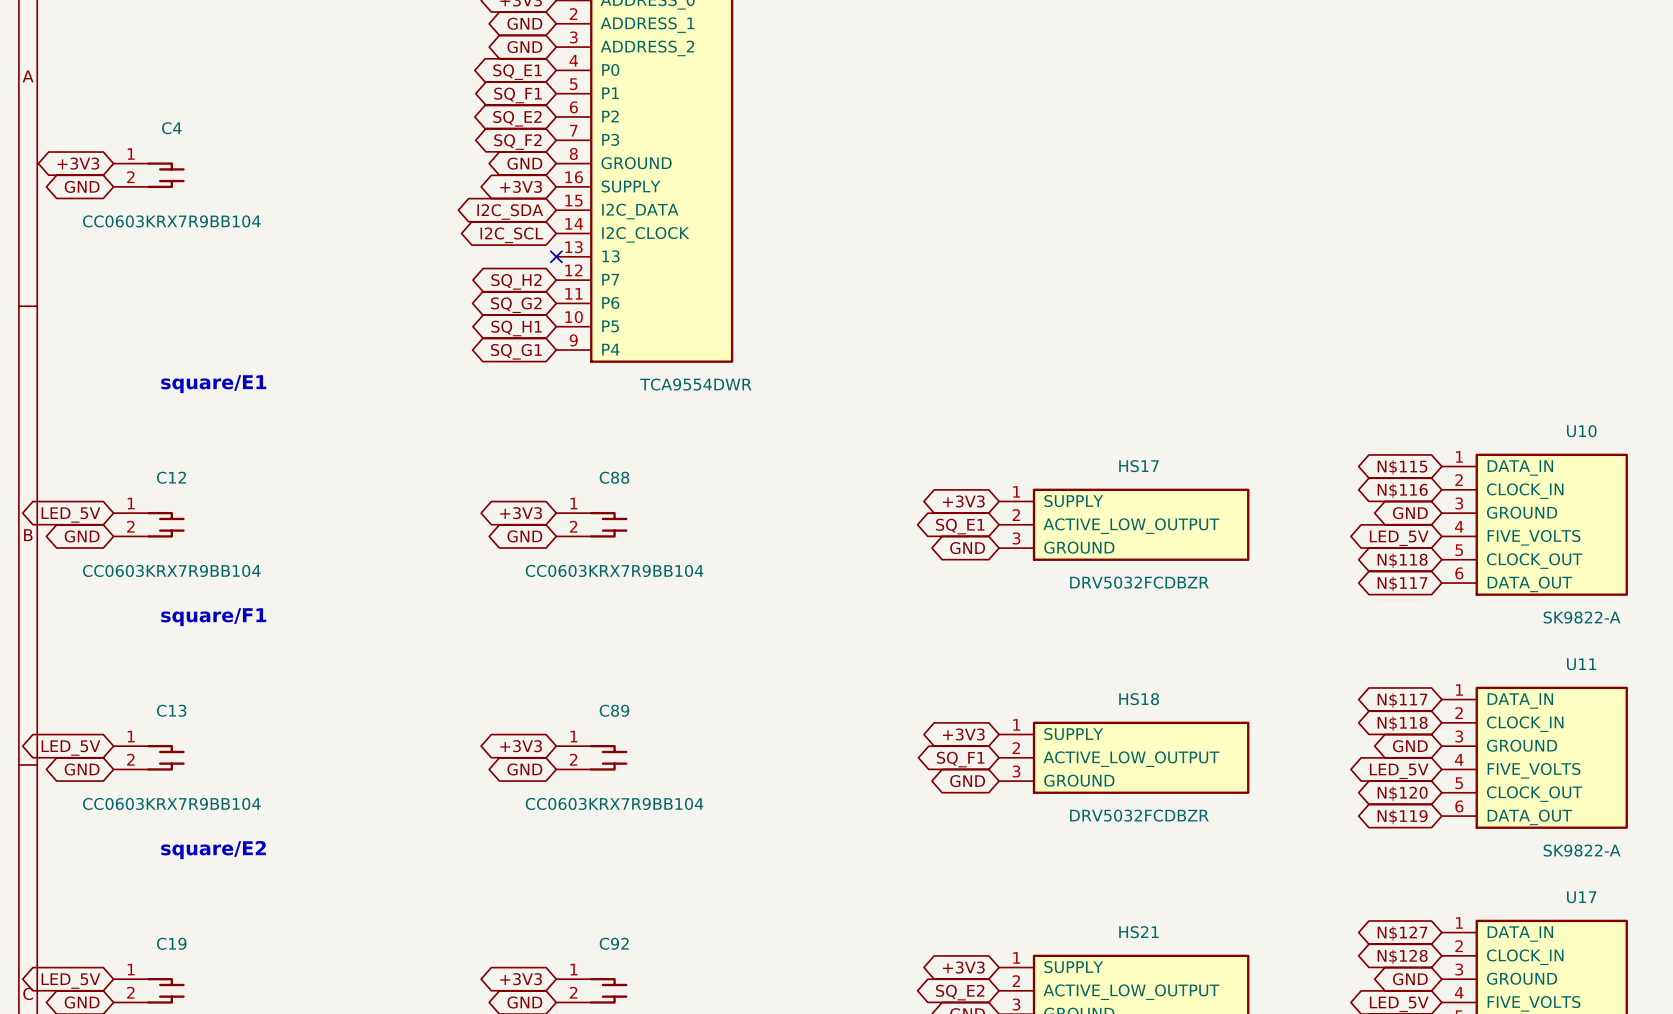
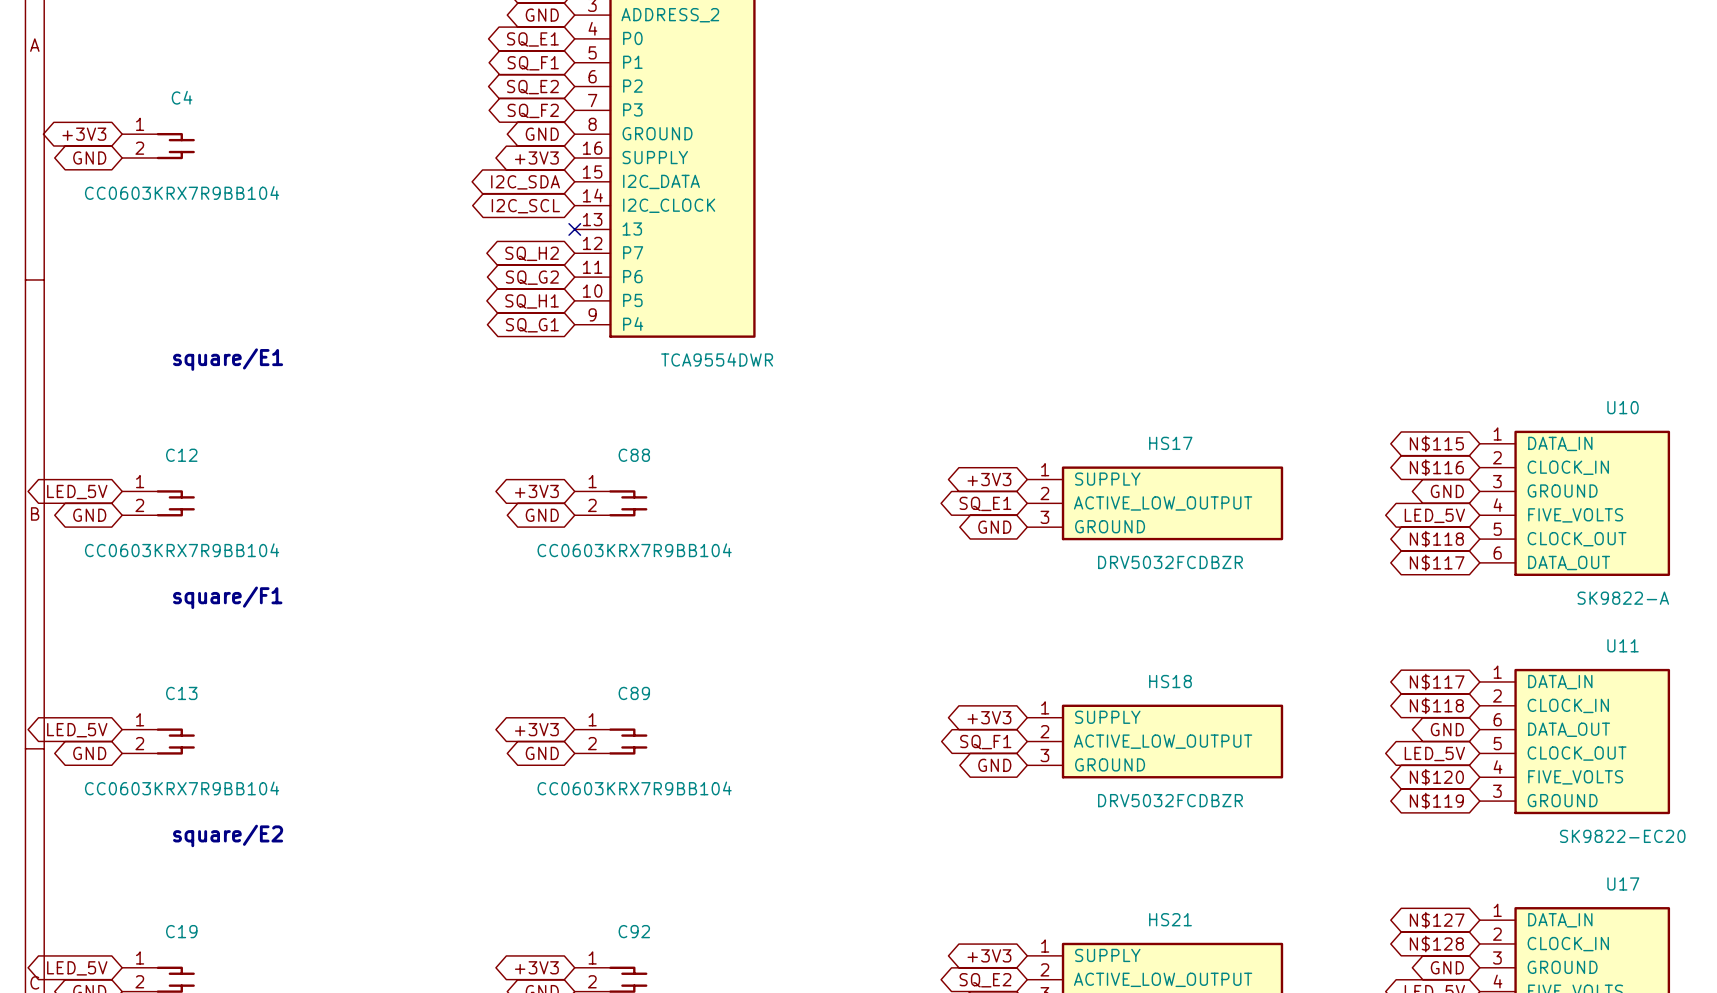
U11 pin number: 3 (1459, 736) -> 6 (1497, 719)
U11 pin name: GROUND (1522, 745) -> DATA_OUT (1569, 729)
U11 pin number: 4 (1459, 759) -> 5 (1497, 743)
U11 pin name: FIVE_VOLTS (1534, 770) -> CLOCK_OUT (1577, 753)
U11 pin number: 5 (1459, 783) -> 4 (1497, 767)
U11 pin name: CLOCK_OUT (1534, 794) -> FIVE_VOLTS (1575, 777)
U11 pin number: 6 (1459, 806) -> 3 (1497, 791)
U11 pin name: DATA_OUT (1529, 817) -> GROUND (1562, 800)
U11 value: SK9822-A (1582, 850) -> SK9822-EC20 (1622, 836)

